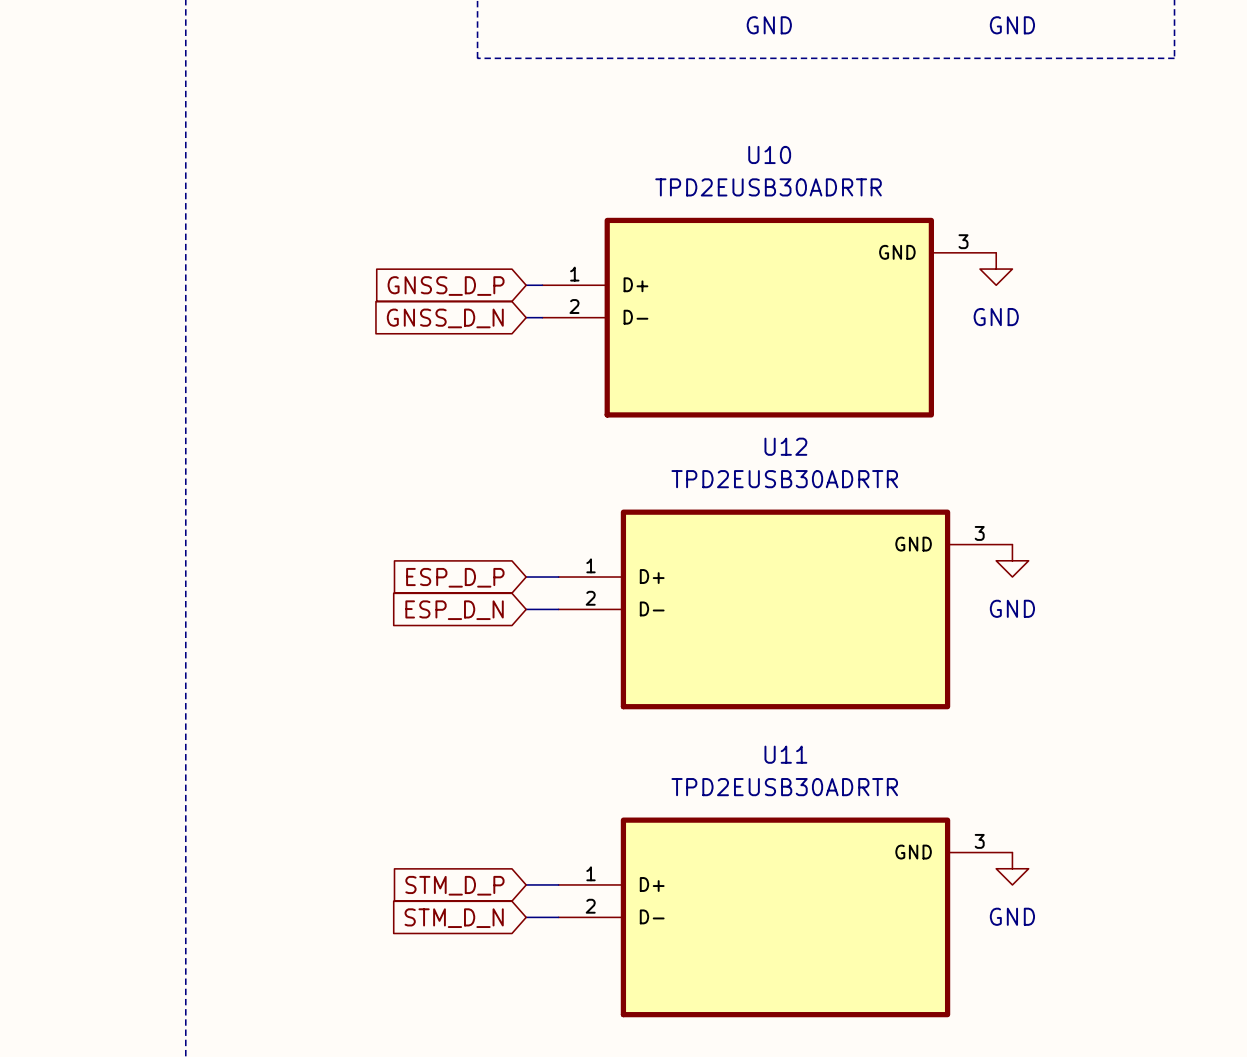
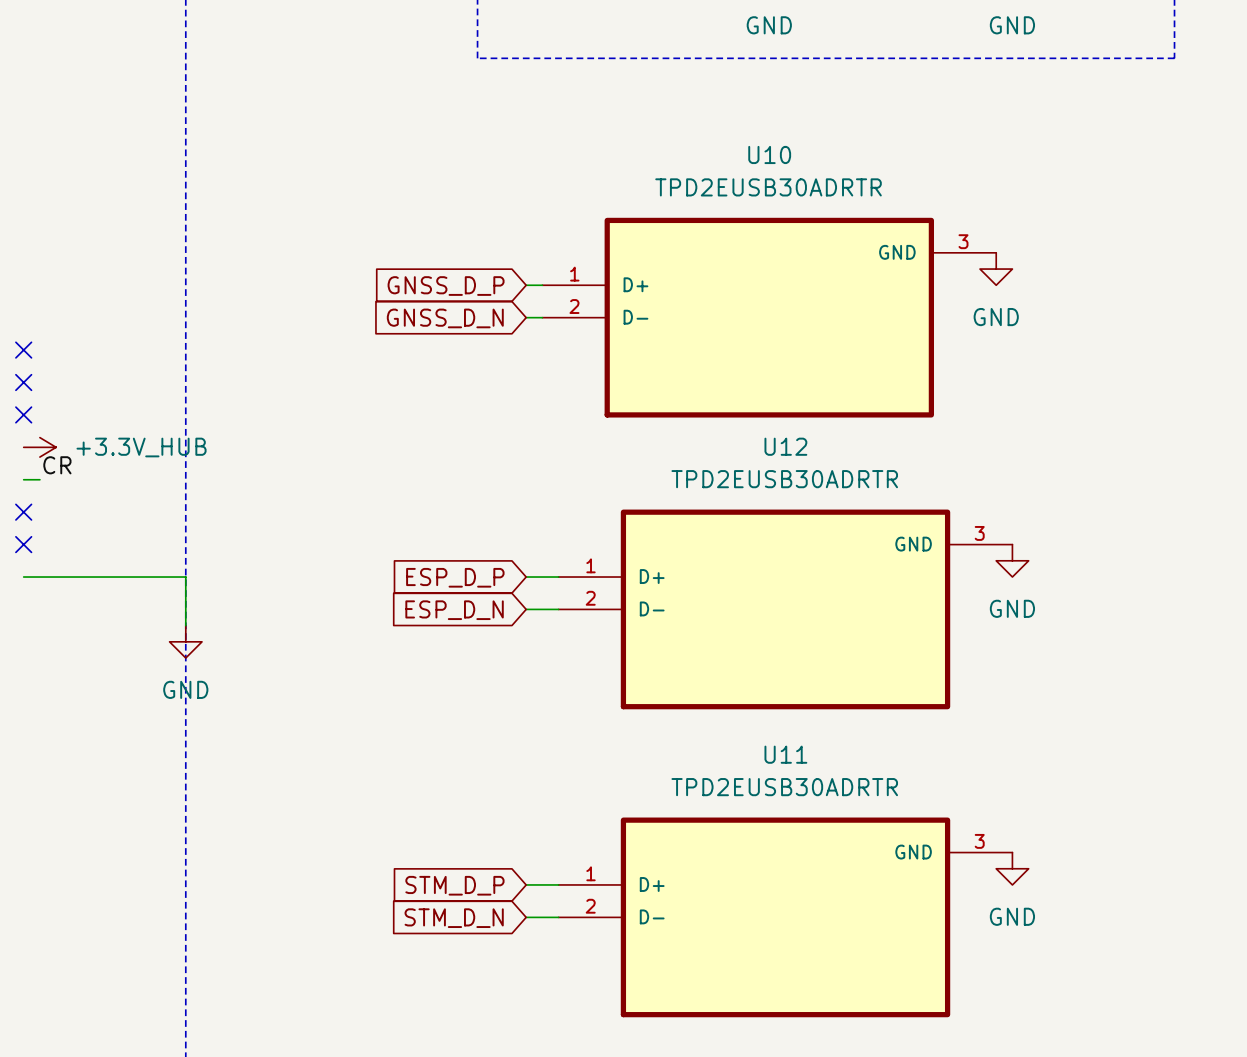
no-connect mark: none -> (23, 350)
no-connect mark: none -> (23, 382)
no-connect mark: none -> (23, 414)
power symbol: none -> +3.3V_HUB (39, 447)
label: none -> CR (57, 465)
wire: none -> (23, 479) (39, 479)
no-connect mark: none -> (23, 512)
no-connect mark: none -> (23, 544)
wire: none -> (23, 577) (185, 577) (185, 625)
power symbol: none -> GND (185, 641)

